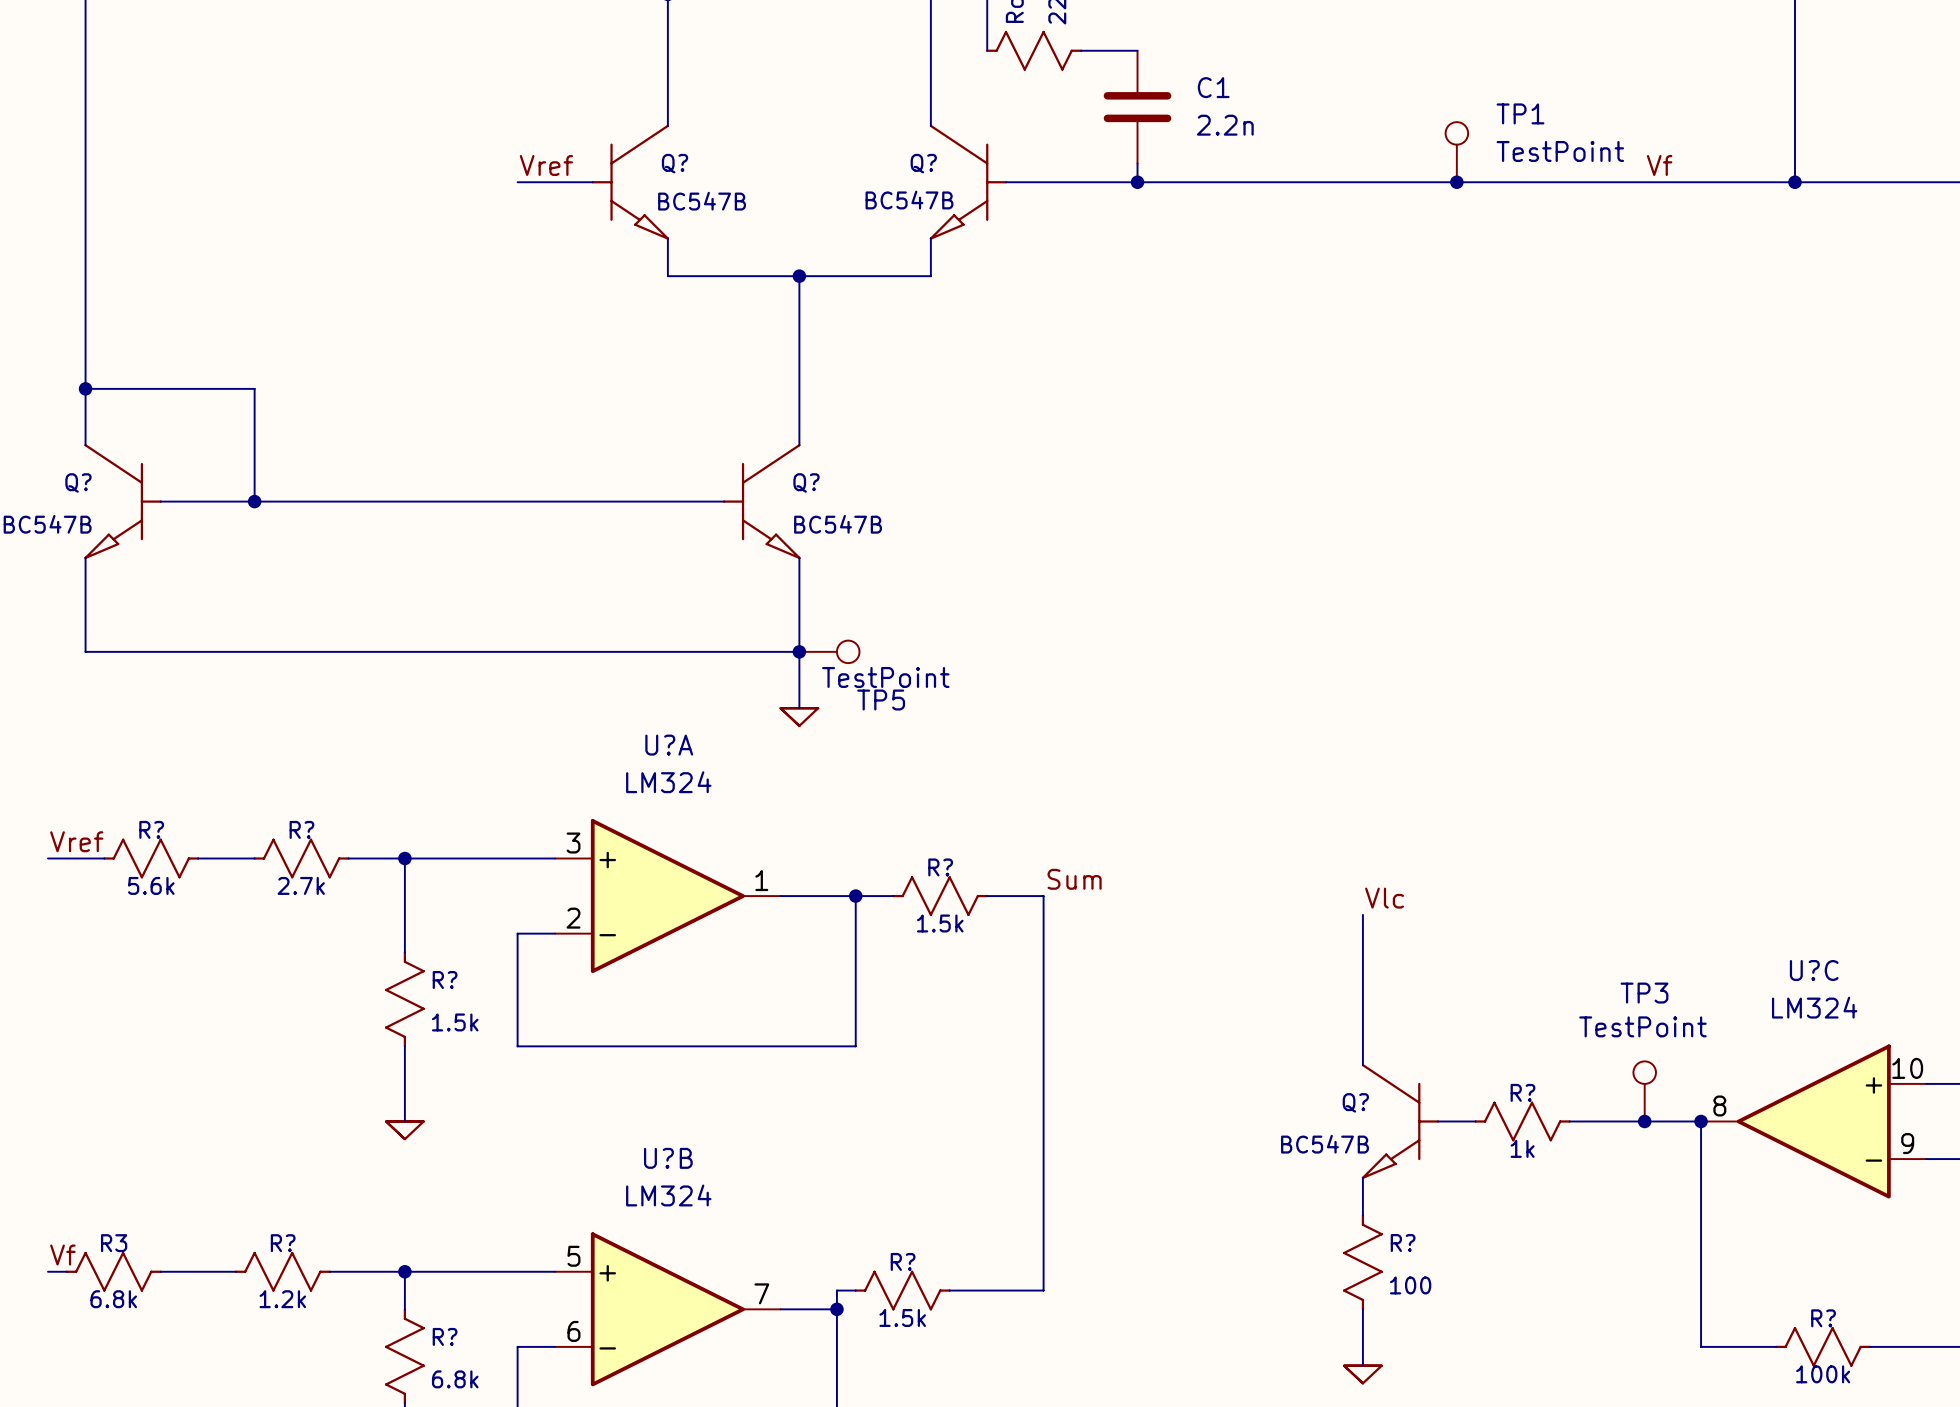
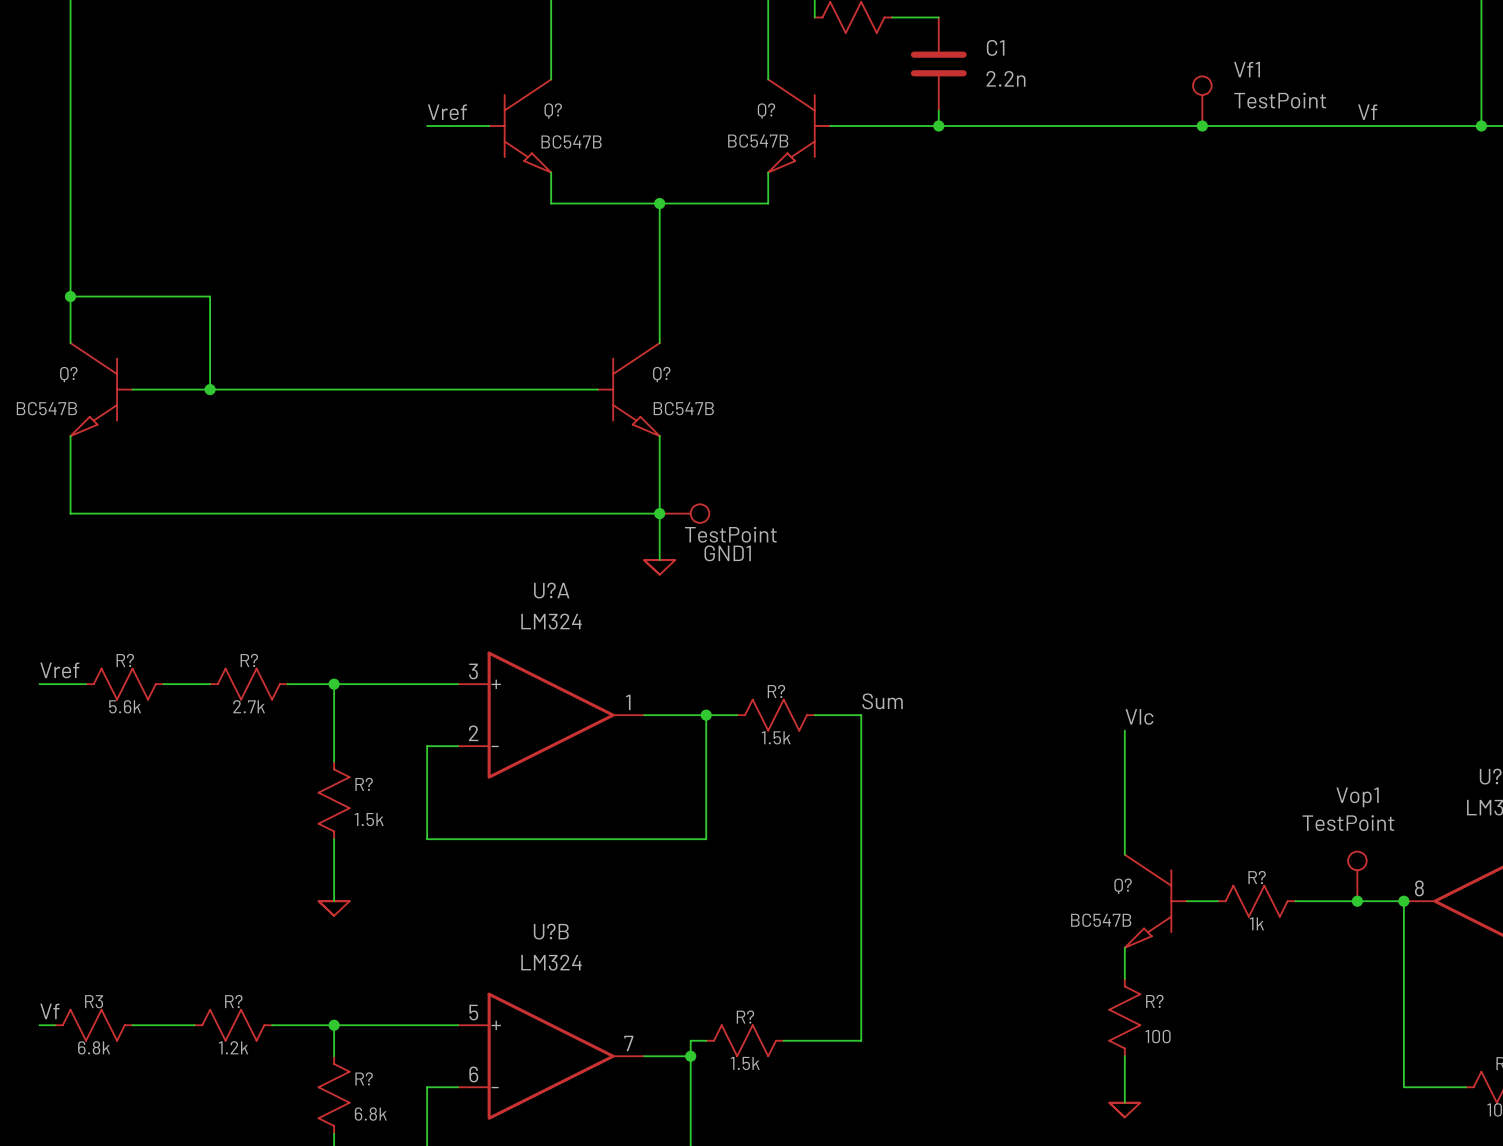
TP1 name: TP1 (1520, 113) -> Vf1 (1247, 69)
TP5 name: TP5 (881, 700) -> GND1 (727, 553)
TP3 name: TP3 (1644, 993) -> Vop1 (1357, 797)

